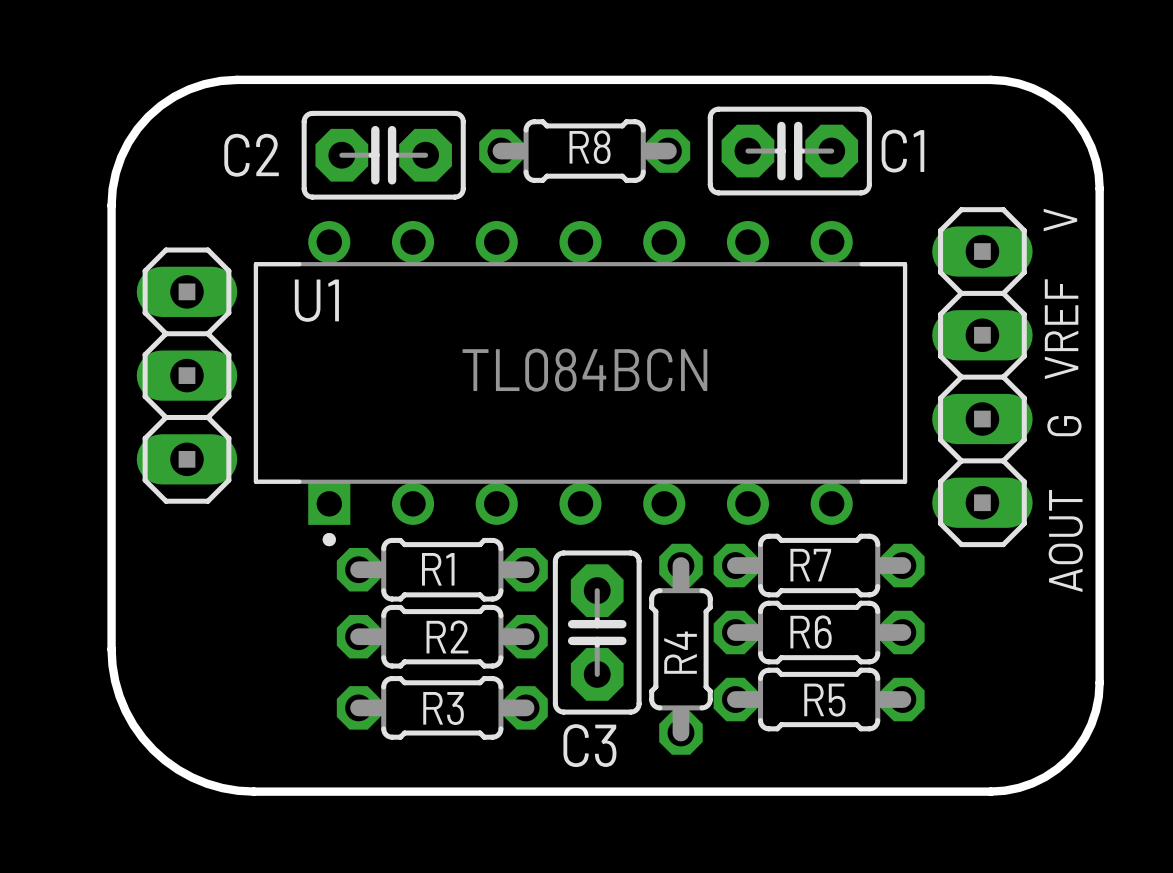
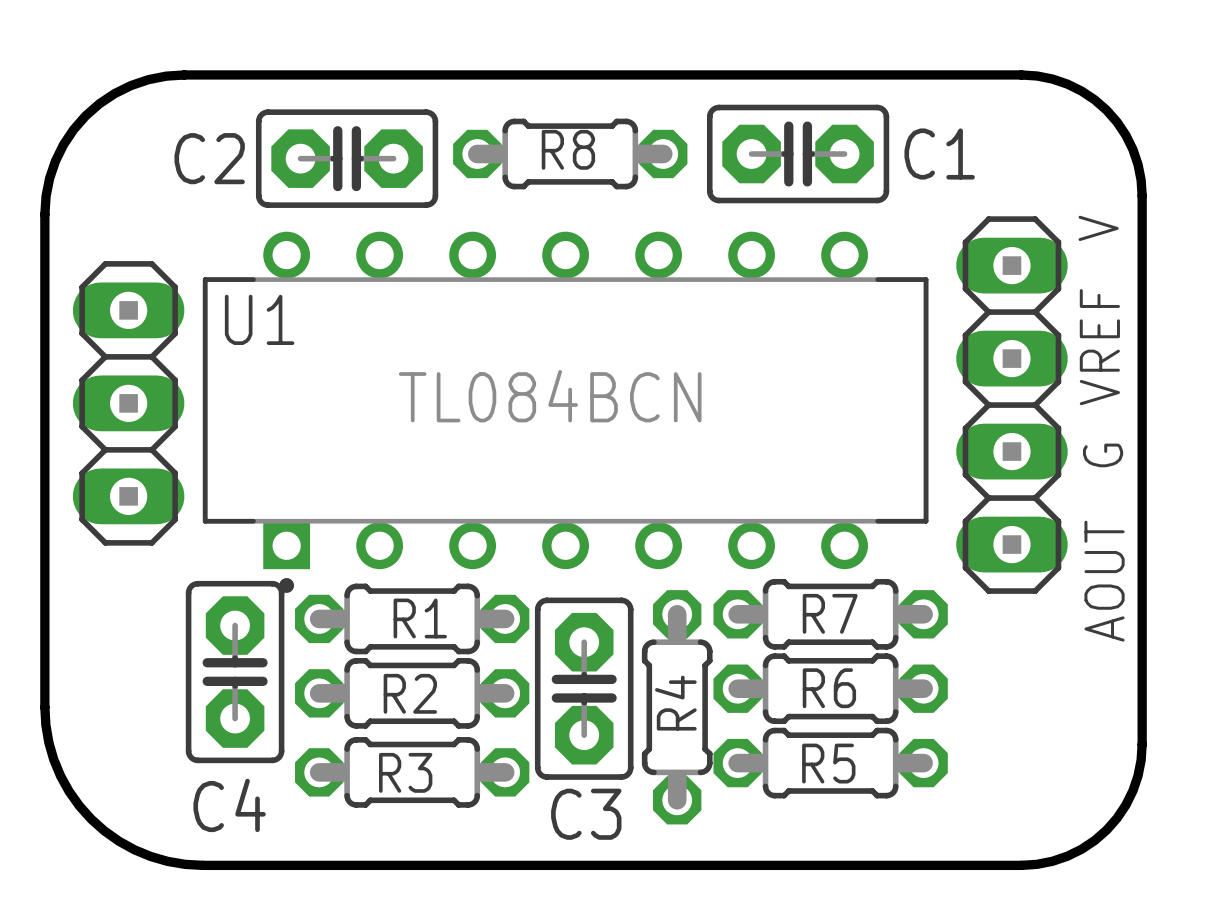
C4: none -> (235, 672)

